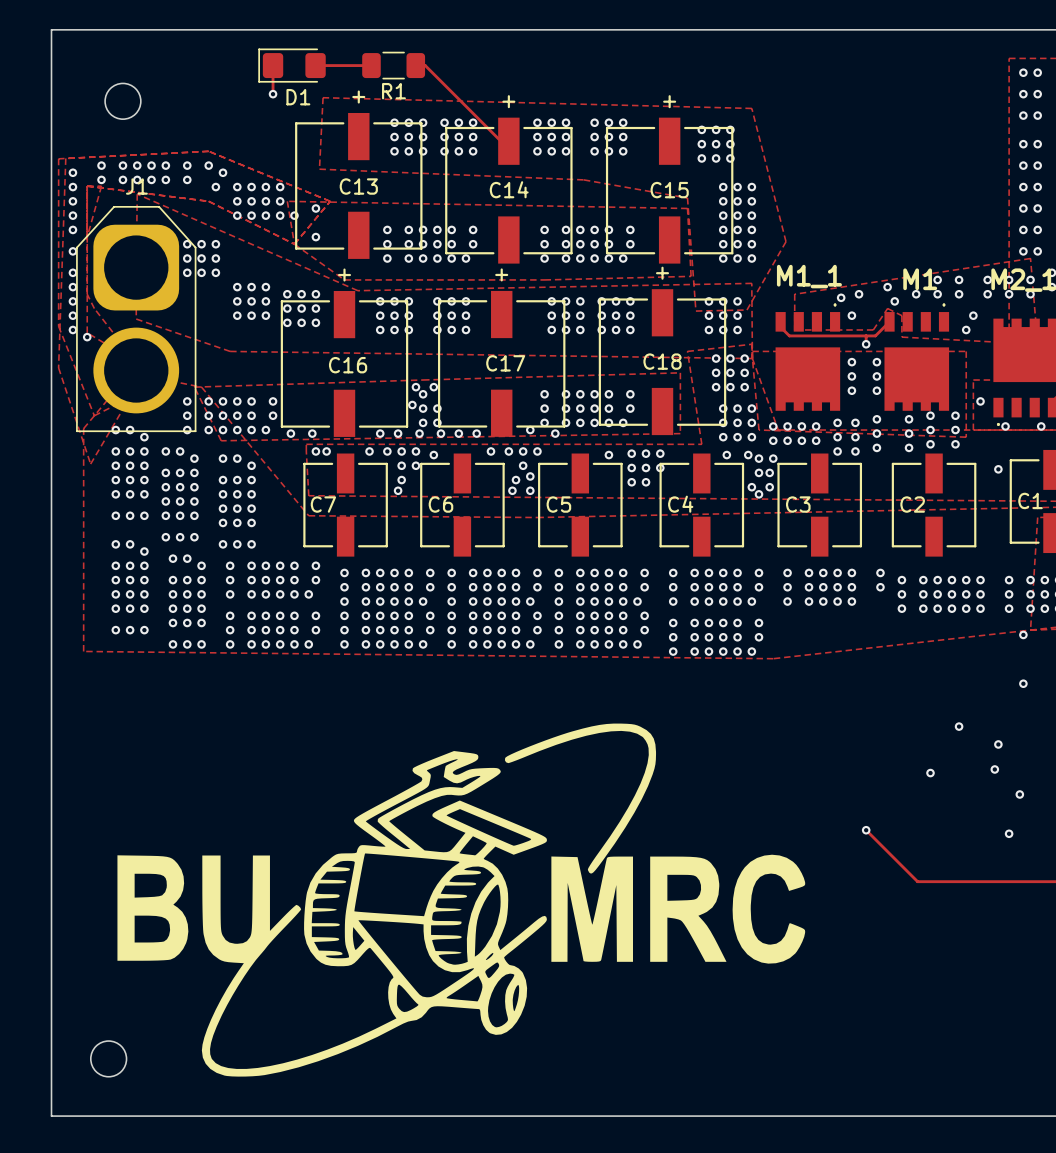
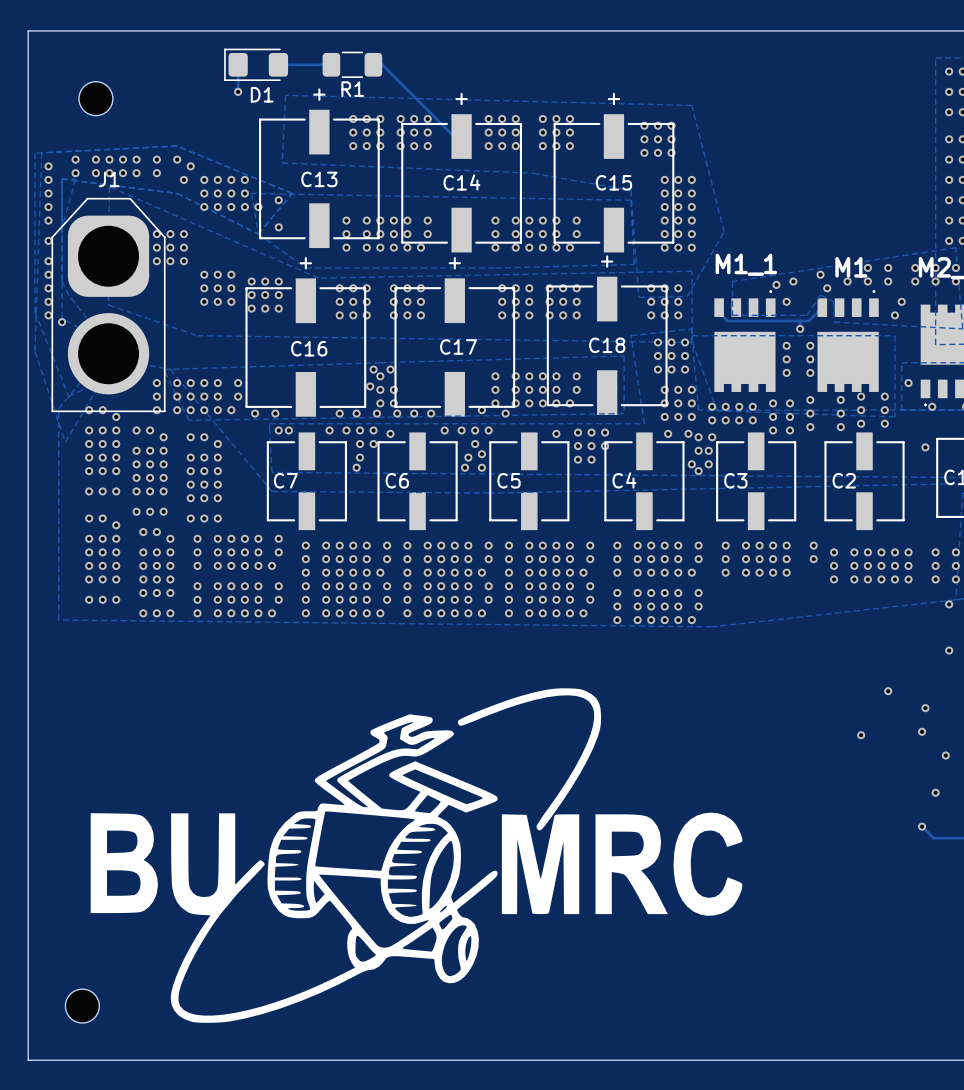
track: (866, 830) (917, 881) (1006, 881) -> (922, 826) (933, 838)
via: (866, 830) -> none
via: none -> (922, 826)

